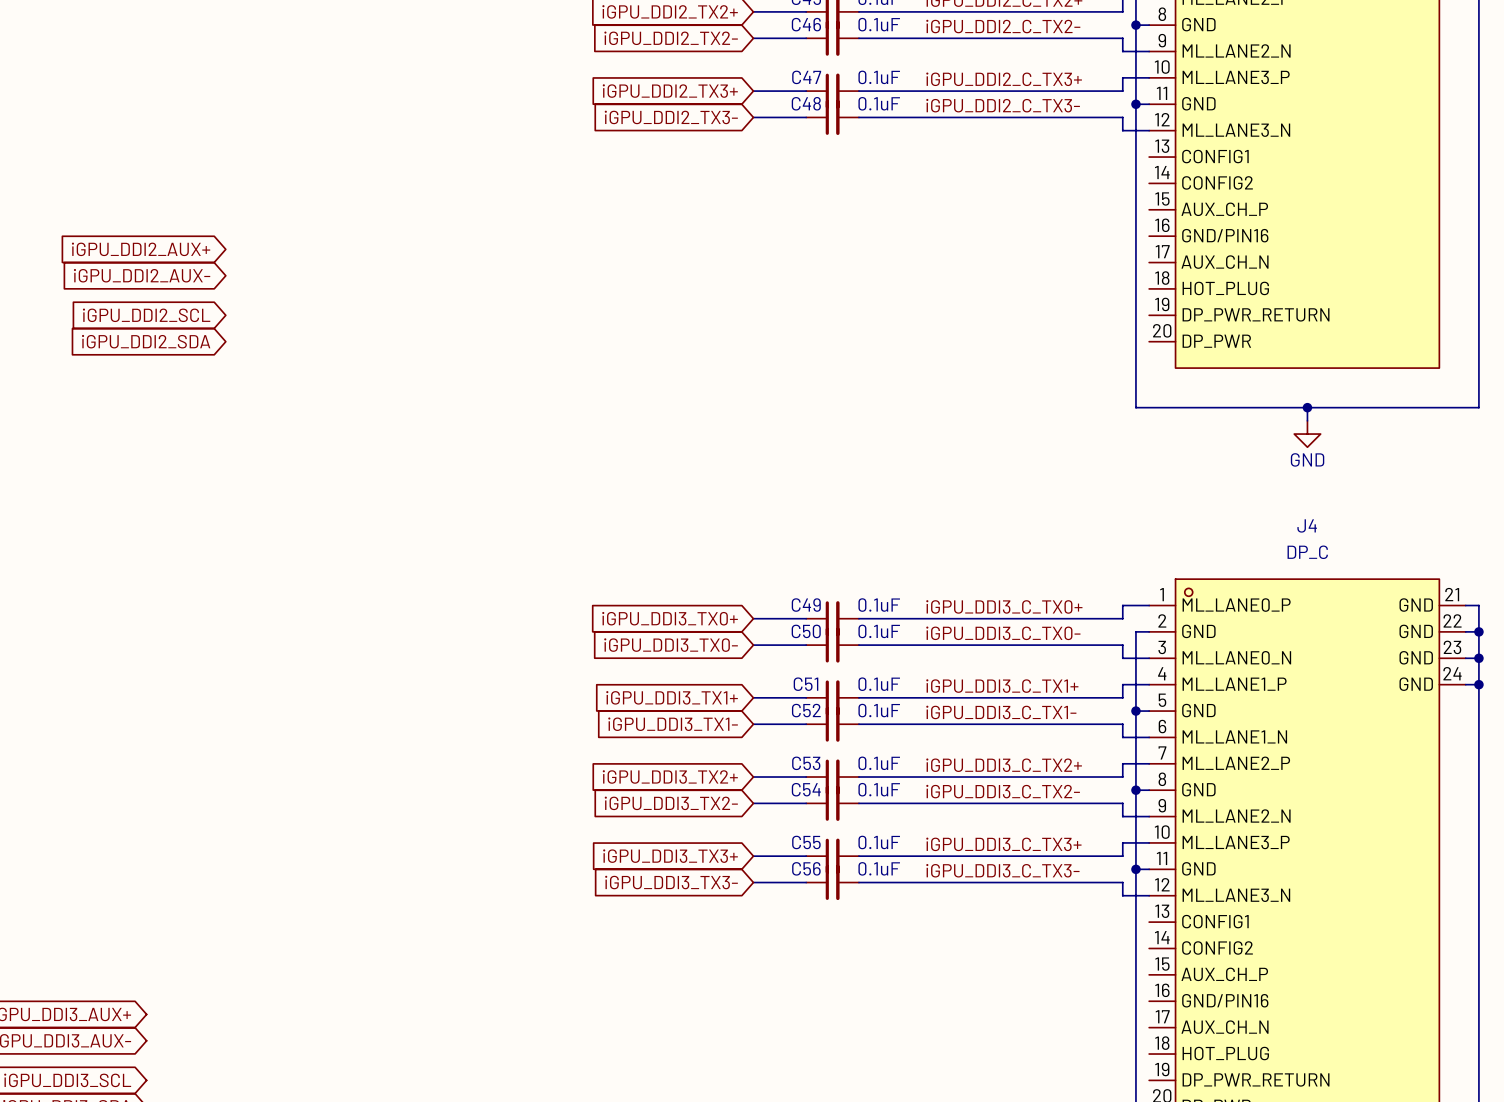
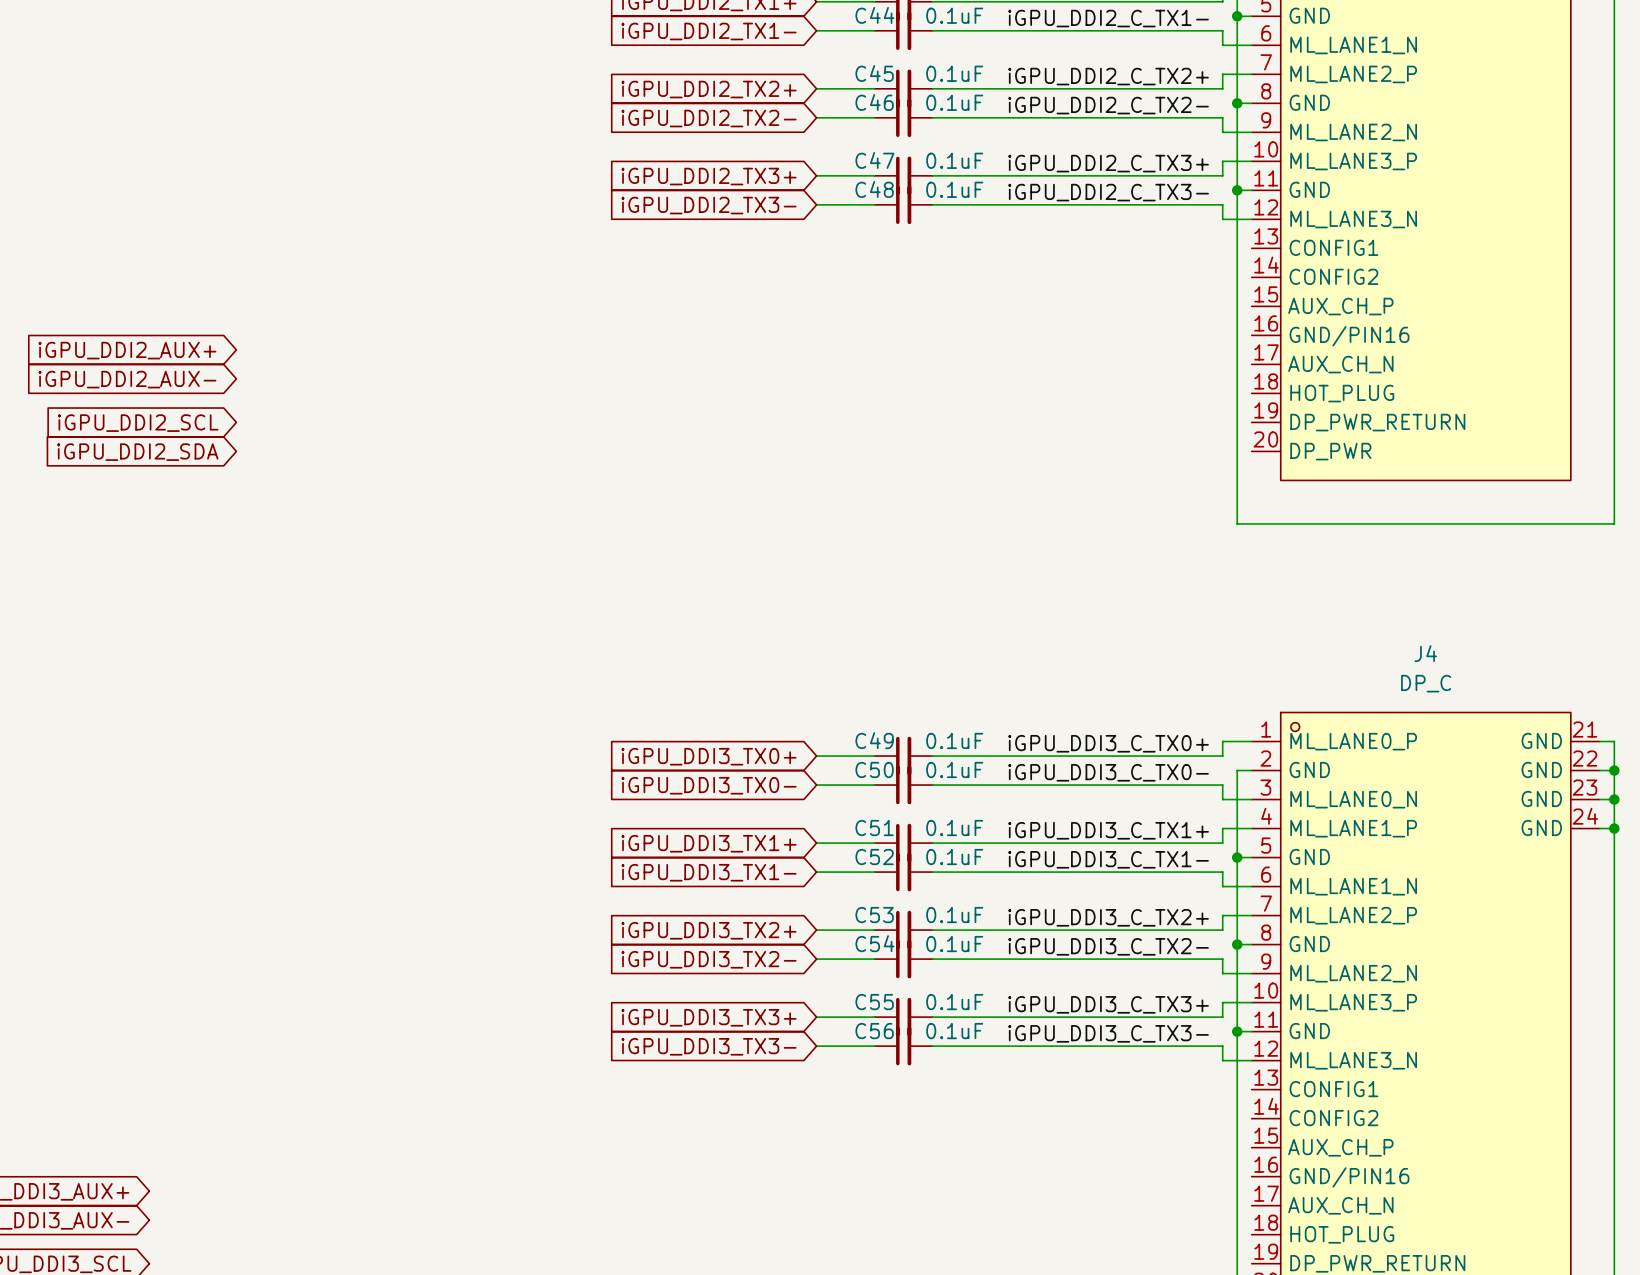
wire: (1307, 407) (1307, 420) -> none
junction: (1307, 407) -> none
power symbol: GND (1307, 434) -> none

